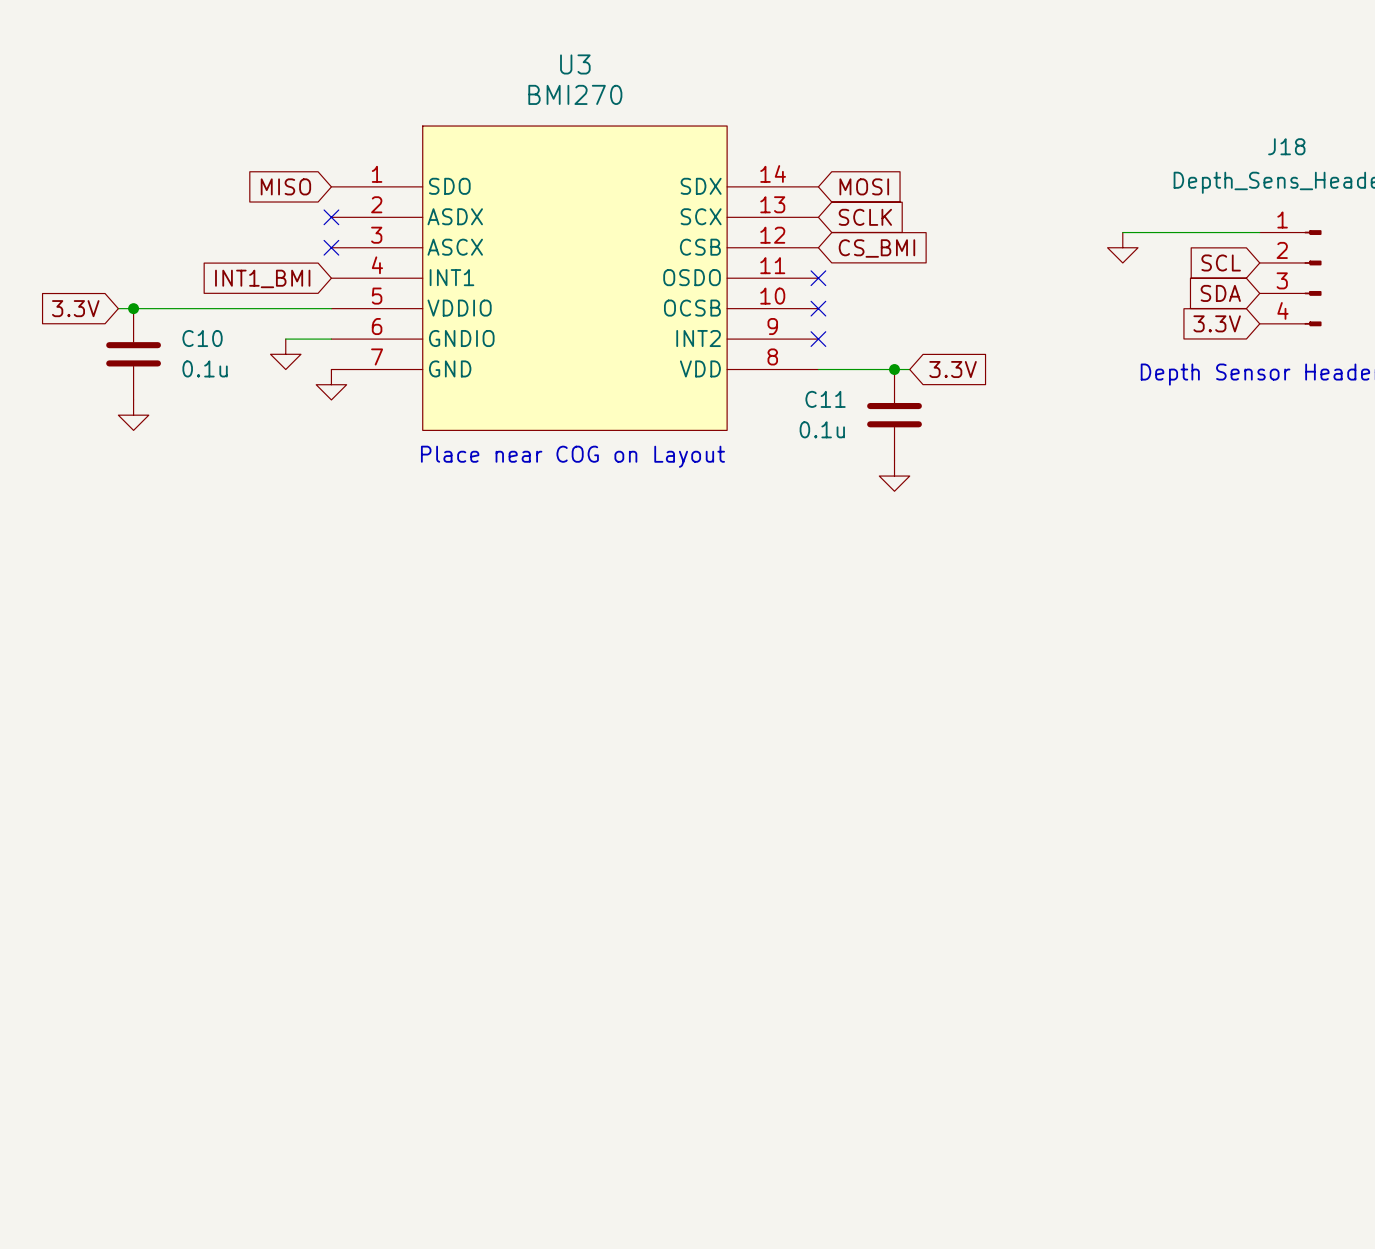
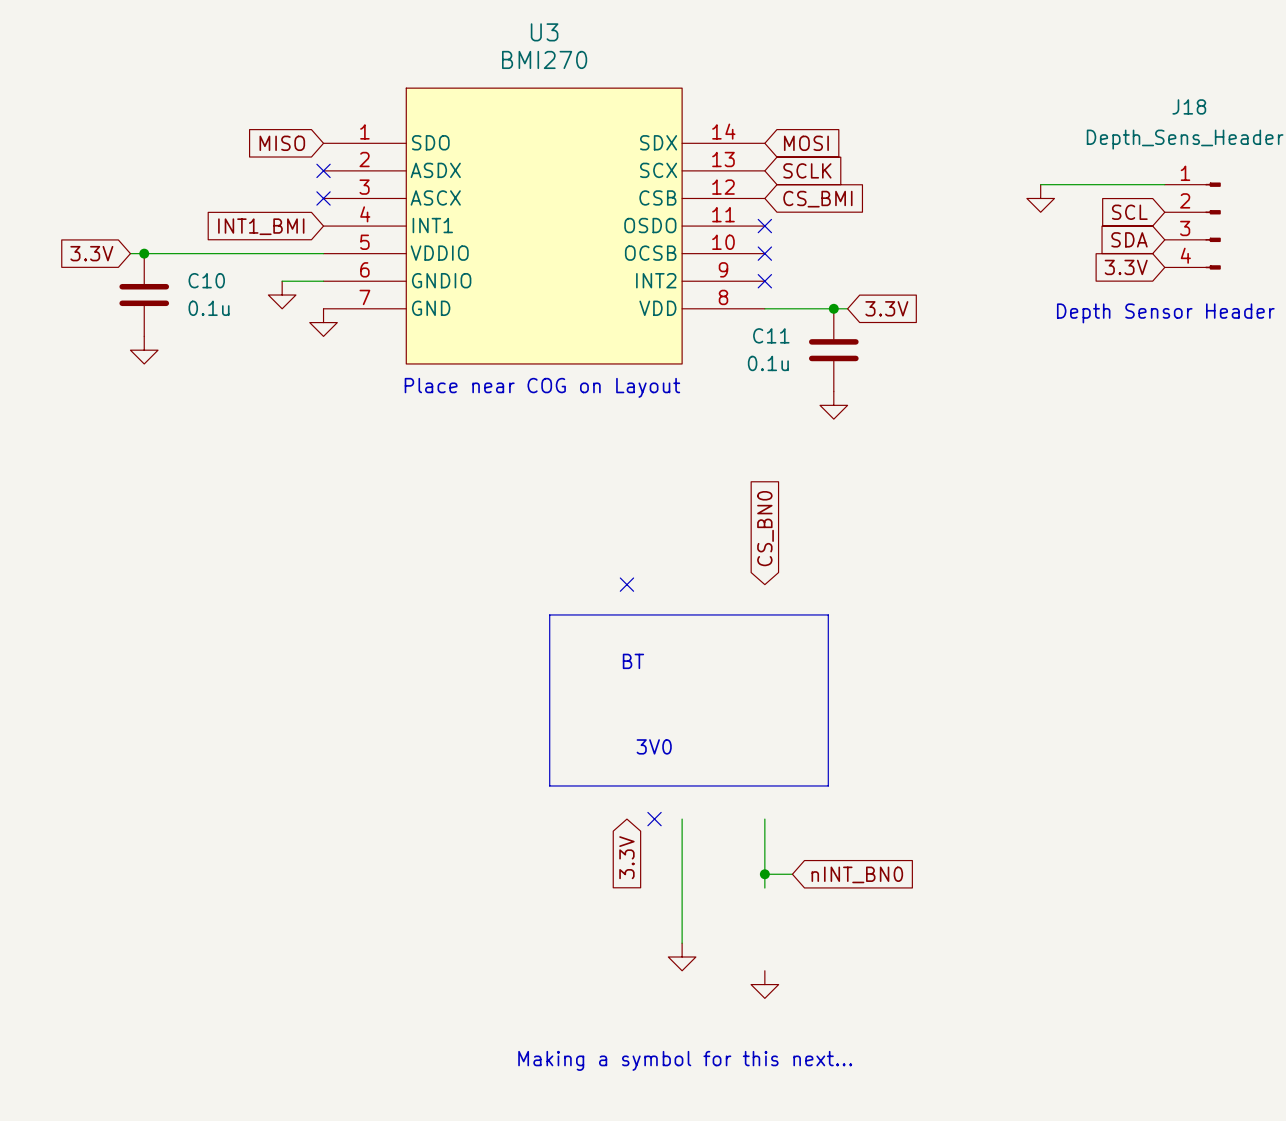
global label: none -> CS_BN0 (765, 528)
no-connect mark: none -> (626, 584)
line: none -> (549, 614) (828, 614) (828, 785) (549, 785) (549, 614)
text: none -> BT (633, 661)
text: none -> 3V0 (654, 746)
no-connect mark: none -> (654, 819)
wire: none -> (682, 819) (682, 943)
wire: none -> (764, 819) (764, 888)
global label: none -> 3.3V (626, 857)
wire: none -> (764, 874) (792, 874)
junction: none -> (764, 874)
global label: none -> nINT_BN0 (857, 874)
power symbol: none -> (682, 957)
power symbol: none -> (764, 984)
text: none -> Making a symbol for this next... (685, 1060)

